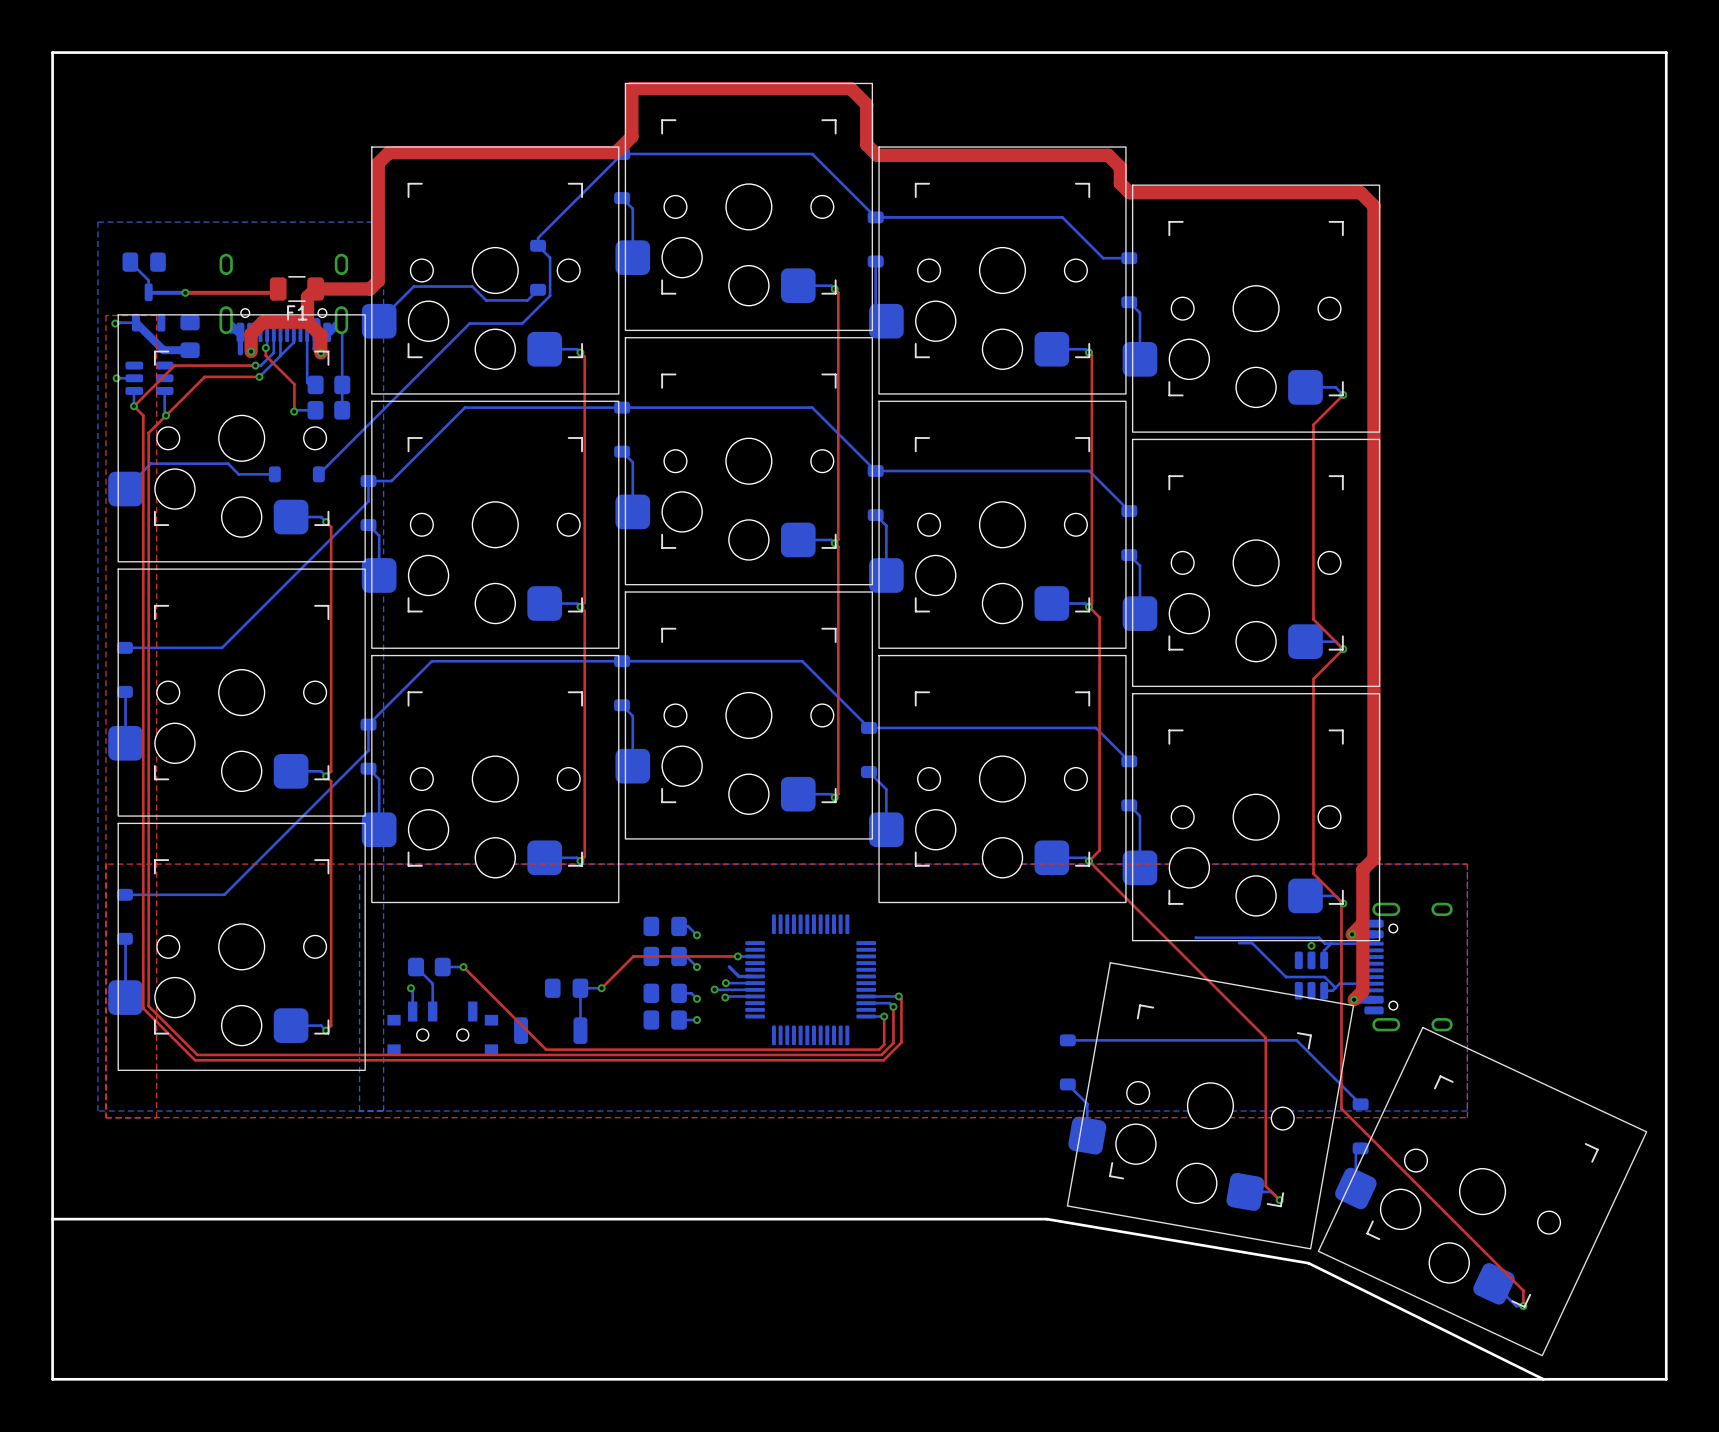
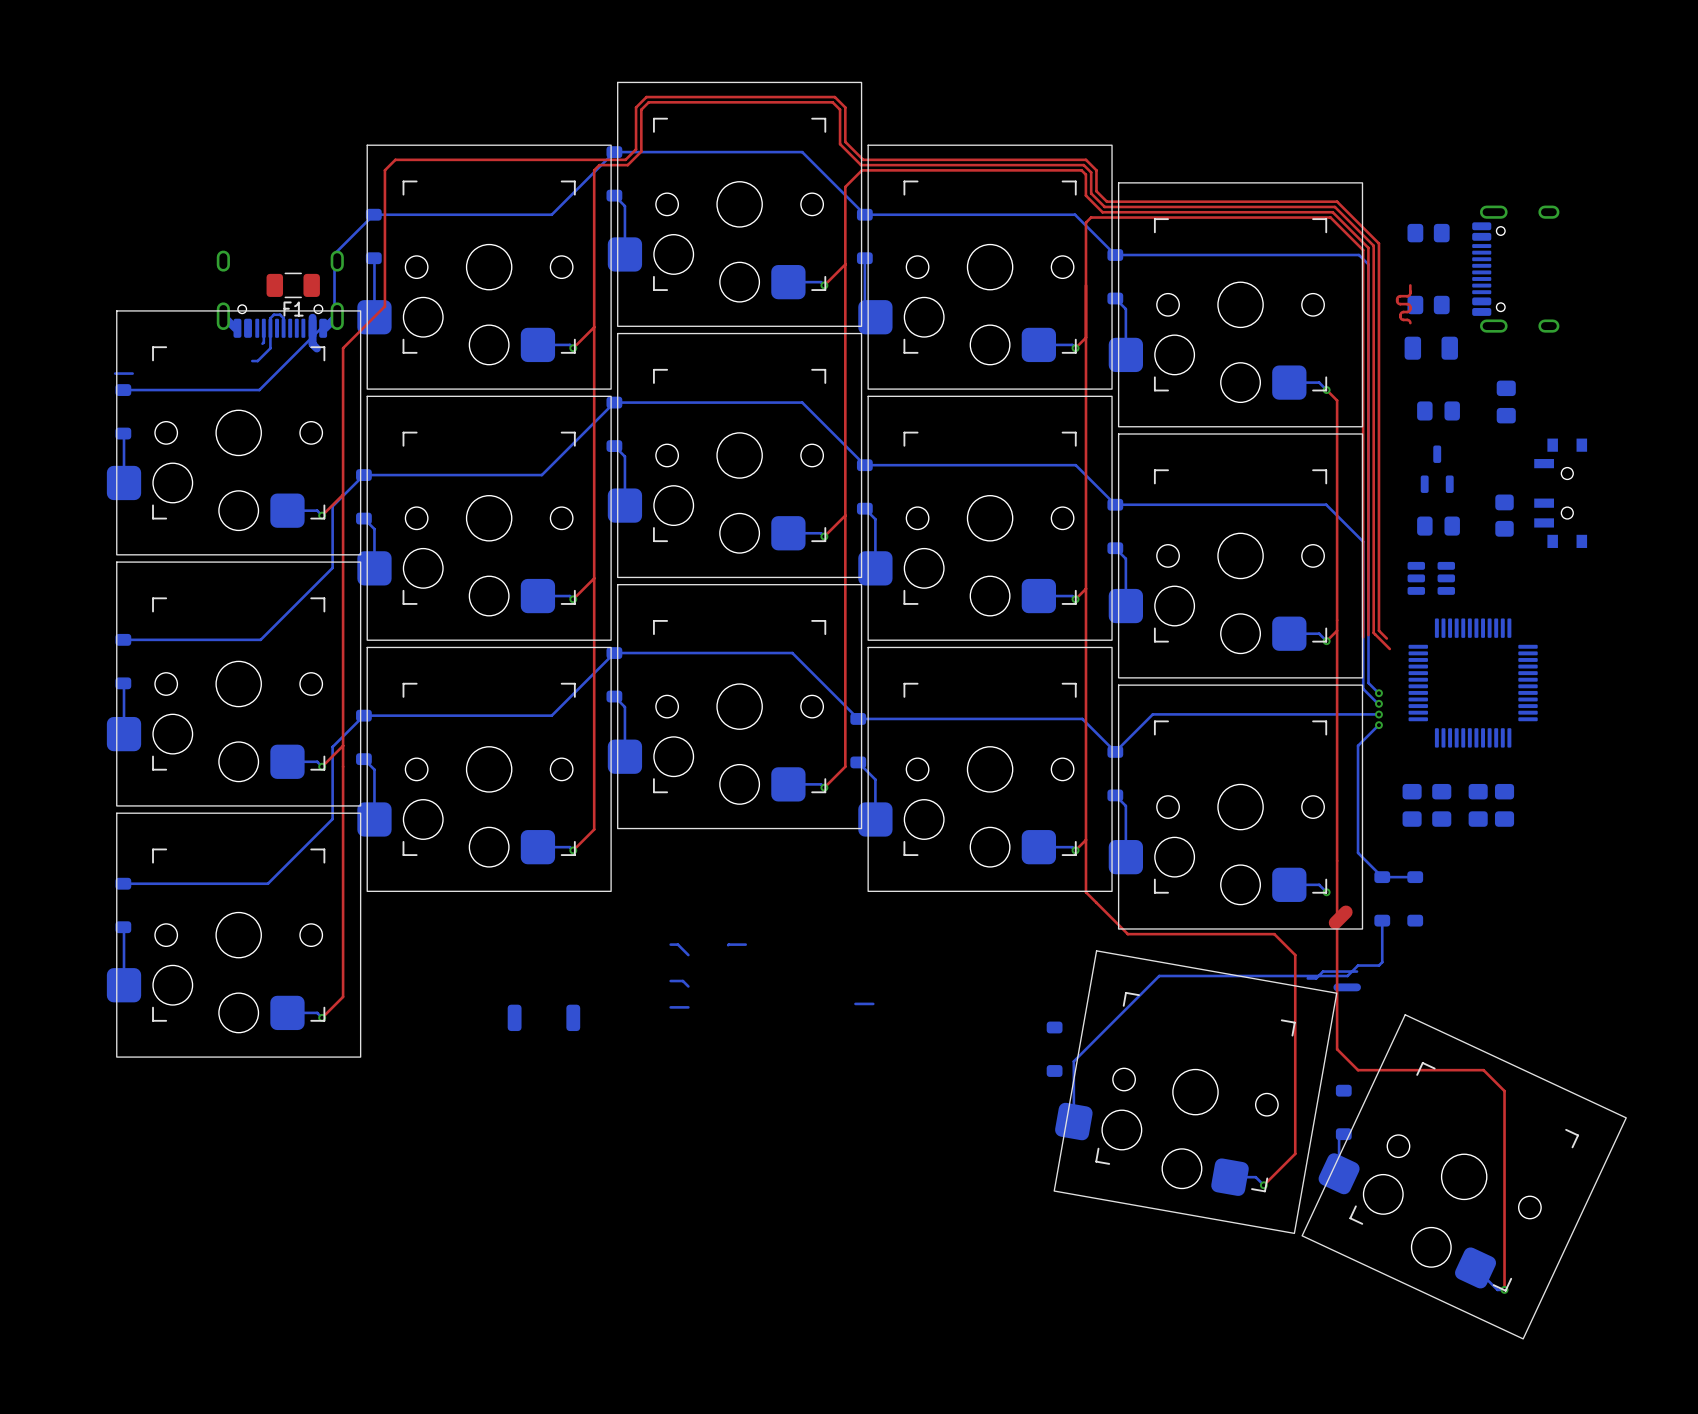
board edge: (52, 52) (1666, 52) (1666, 1379) (52, 1379) (52, 52) -> none
bottom track: (558, 217) (538, 238) (538, 245) (550, 257) (550, 295) (522, 323) (469, 323) (318, 474) -> (551, 214) (373, 214) (334, 254) (334, 314) (259, 390) (123, 390)
bottom track: (1062, 217) (1103, 258) (1129, 258) -> (1049, 214) (1075, 214) (1115, 255) (1359, 255) (1368, 264) (1368, 683) (1378, 693)
part: none -> (1428, 233)
part: none -> (373, 236)
bottom track: (130, 262) (148, 280) (148, 292) -> none
part: (144, 262) -> none
part: (538, 267) -> none
top track: none -> (845, 264) (824, 285)
part: none -> (1515, 269)
top track: (278, 288) (274, 292) (185, 292) (184, 290) -> none
top track: (834, 288) (838, 292) (838, 539) -> (845, 515) (827, 532)
top track: none -> (1410, 285) (1409, 295) (1399, 296) (1397, 299) (1398, 303) (1409, 305) (1409, 310) (1401, 312) (1400, 316) (1410, 323)
bottom track: (538, 289) (527, 300) (486, 300) (472, 286) (413, 286) (379, 321) -> (373, 258) (374, 317)
bottom track: (148, 292) (149, 292) (185, 292) (182, 292) -> none
via: (185, 292) -> none
part: (148, 307) -> none
part: none -> (1428, 305)
top track: (307, 322) (320, 335) (320, 352) -> none
top track: (307, 322) (307, 297) (315, 288) (370, 288) (378, 280) (378, 163) (388, 152) (615, 152) (631, 136) (631, 88) (850, 88) (866, 104) (866, 144) (877, 155) (1108, 155) (1120, 167) (1120, 183) (1129, 192) (1360, 192) (1373, 206) (1373, 858) (1362, 869) (1362, 990) (1354, 999) -> none
top track: (307, 322) (262, 322) (251, 333) (251, 351) -> none
bottom track: (115, 323) (135, 322) (163, 350) (190, 350) -> none
via: (115, 323) -> none
bottom track: (340, 324) (342, 410) -> none
top track: none -> (594, 327) (573, 348)
bottom track: (230, 332) (240, 332) (240, 352) -> none
bottom track: (280, 332) (280, 355) -> none
bottom track: (293, 332) (293, 342) (259, 376) -> none
bottom track: (307, 332) (307, 382) (309, 384) (315, 384) -> none
part: (190, 336) -> none
top track: none -> (1085, 337) (1075, 348)
top track: (265, 348) (265, 355) (294, 384) (294, 411) -> none
via: (265, 348) -> none
via: (251, 351) -> none
via: (320, 352) -> none
top track: (580, 352) (584, 356) (584, 602) -> (594, 578) (577, 595)
top track: (1089, 352) (1091, 355) (1091, 603) -> (1085, 588) (1078, 596)
part: none -> (1431, 348)
top track: (255, 365) (174, 365) (133, 406) (143, 415) (143, 1008) (195, 1060) (883, 1060) (901, 1042) (901, 999) (898, 996) -> none
via: (255, 365) -> none
top track: (259, 376) (204, 376) (148, 432) (148, 1006) (197, 1054) (881, 1054) (893, 1042) (893, 1006) -> none
via: (259, 376) -> none
via: (116, 378) -> none
part: (149, 378) -> none
part: (328, 384) -> none
bottom track: (134, 390) (133, 406) -> none
bottom track: (164, 390) (166, 415) -> none
top track: (1343, 394) (1313, 424) (1313, 619) (1343, 649) (1313, 678) (1313, 873) (1343, 903) (1341, 905) (1341, 1108) (1523, 1290) -> (1326, 390) (1337, 400) (1337, 1049) (1358, 1070) (1483, 1070) (1504, 1091) (1504, 1274)
via: (133, 406) -> none
bottom track: (622, 407) (465, 407) (391, 481) -> (614, 402) (541, 475) (386, 475)
part: none -> (1506, 401)
bottom track: (315, 410) (294, 411) -> none
part: (328, 410) -> none
via: (294, 411) -> none
via: (166, 415) -> none
part: none -> (123, 411)
part: none -> (1438, 410)
bottom track: (274, 474) (238, 474) (228, 463) (150, 463) (125, 489) -> (123, 433) (124, 482)
part: (296, 474) -> none
part: none -> (1437, 469)
bottom track: (368, 481) (368, 501) (222, 647) -> (363, 475) (332, 506) (332, 567) (260, 639) (219, 639)
part: none -> (1560, 493)
top track: none -> (343, 494) (322, 515)
bottom track: none -> (1115, 504) (1326, 504) (1363, 541) (1363, 688) (1378, 703)
top track: (326, 522) (331, 527) (331, 771) -> (343, 745) (327, 761)
part: none -> (1504, 515)
part: none -> (1438, 526)
top track: (834, 543) (838, 546) (838, 793) -> (1368, 635) (1368, 247) (1332, 212) (1102, 212) (1085, 195) (1085, 174) (1081, 170) (861, 170) (845, 186) (845, 766) (827, 784)
part: none -> (1431, 578)
top track: (580, 606) (584, 611) (584, 856) -> (1389, 648) (1373, 632) (1373, 245) (1334, 206) (1104, 206) (1091, 193) (1091, 172) (1083, 165) (861, 165) (840, 144) (840, 109) (832, 102) (648, 102) (641, 109) (641, 151) (627, 165) (599, 165) (594, 170) (594, 829) (577, 846)
top track: (1089, 606) (1099, 617) -> (1363, 637) (1363, 250) (1330, 217) (1091, 217) (1085, 222) (1085, 609)
top track: none -> (1337, 630) (1326, 641)
bottom track: (622, 661) (431, 661) (368, 724) (368, 750) (224, 894) -> (614, 653) (551, 715) (363, 715) (332, 746) (332, 819) (267, 883) (221, 883)
part: none -> (1473, 683)
via: none -> (1378, 693)
via: none -> (1378, 703)
bottom track: none -> (1378, 714) (1152, 714) (1115, 751)
via: none -> (1378, 714)
bottom track: none -> (1378, 724) (1358, 745) (1358, 852) (1382, 877) (1415, 877)
via: none -> (1378, 725)
top track: (326, 776) (331, 781) (331, 1025) -> (1386, 638) (1378, 630) (1378, 243) (1337, 201) (1106, 201) (1096, 191) (1096, 170) (1085, 159) (863, 159) (845, 141) (845, 107) (834, 97) (646, 97) (636, 107) (636, 149) (625, 159) (395, 159) (384, 170) (384, 306) (343, 348) (343, 996) (327, 1012)
part: none -> (1412, 805)
part: none -> (1441, 805)
part: none -> (1478, 805)
part: none -> (1504, 805)
top track: (1089, 861) (1265, 1037) (1265, 1186) (1279, 1200) -> (1085, 839) (1085, 892) (1127, 934) (1274, 934) (1295, 955) (1295, 1153) (1263, 1185)
top zone outline: (105, 864) (1467, 864) (1467, 1117) (105, 1117) (105, 315) (156, 315) (156, 1117) -> none
part: none -> (1382, 898)
part: none -> (1415, 898)
part: (665, 926) -> none
bottom track: (679, 926) (688, 926) (697, 935) -> none
via: (1352, 934) -> none
via: (697, 935) -> none
bottom track: (1195, 937) (1318, 937) (1324, 943) (1374, 943) -> none
bottom track: (1239, 943) (1252, 943) (1286, 977) (1324, 977) (1335, 987) -> none
bottom track: (1331, 943) (1324, 950) (1324, 960) -> none
via: (1311, 945) -> none
part: (665, 956) -> none
top track: (737, 956) (633, 956) (601, 988) -> none
via: (737, 956) -> none
bottom track: (729, 966) (738, 976) (755, 976) -> none
bottom track: (416, 967) (432, 983) (432, 1011) -> none
part: (429, 967) -> none
bottom track: (442, 967) (463, 967) -> none
top track: (463, 967) (546, 1049) (879, 1049) (884, 1044) (884, 1016) -> none
via: (463, 967) -> none
via: (697, 967) -> none
part: (1408, 967) -> none
part: (1311, 975) -> none
part: (810, 979) -> none
bottom track: (725, 983) (755, 983) -> none
via: (725, 983) -> none
bottom track: (410, 988) (412, 989) (412, 1011) -> none
via: (410, 988) -> none
part: (566, 988) -> none
bottom track: (601, 988) (580, 988) (580, 1030) -> none
via: (601, 988) -> none
bottom track: (714, 989) (755, 989) -> none
via: (714, 989) -> none
part: (665, 993) -> none
bottom track: (755, 996) (725, 997) -> none
bottom track: (866, 996) (898, 996) -> none
via: (898, 996) -> none
via: (725, 997) -> none
via: (697, 998) -> none
via: (1354, 999) -> none
bottom track: (866, 1003) (889, 1003) (893, 1006) -> none
via: (893, 1006) -> none
via: (884, 1016) -> none
part: (665, 1020) -> none
via: (697, 1020) -> none
part: (442, 1028) -> none
bottom track: (1067, 1040) (1296, 1040) (1360, 1104) -> none
bottom track: (1067, 1084) (1087, 1103) -> (1382, 920) (1382, 962) (1378, 965) (1358, 965) (1347, 976) (1159, 976) (1073, 1061) (1073, 1090)
bottom zone outline: (359, 1111) (359, 864) (1467, 864) (1467, 1111) (97, 1111) (97, 222) (383, 222) (383, 1111) -> none
board edge: (52, 1219) (1046, 1219) (1308, 1263) (1543, 1379) -> none

